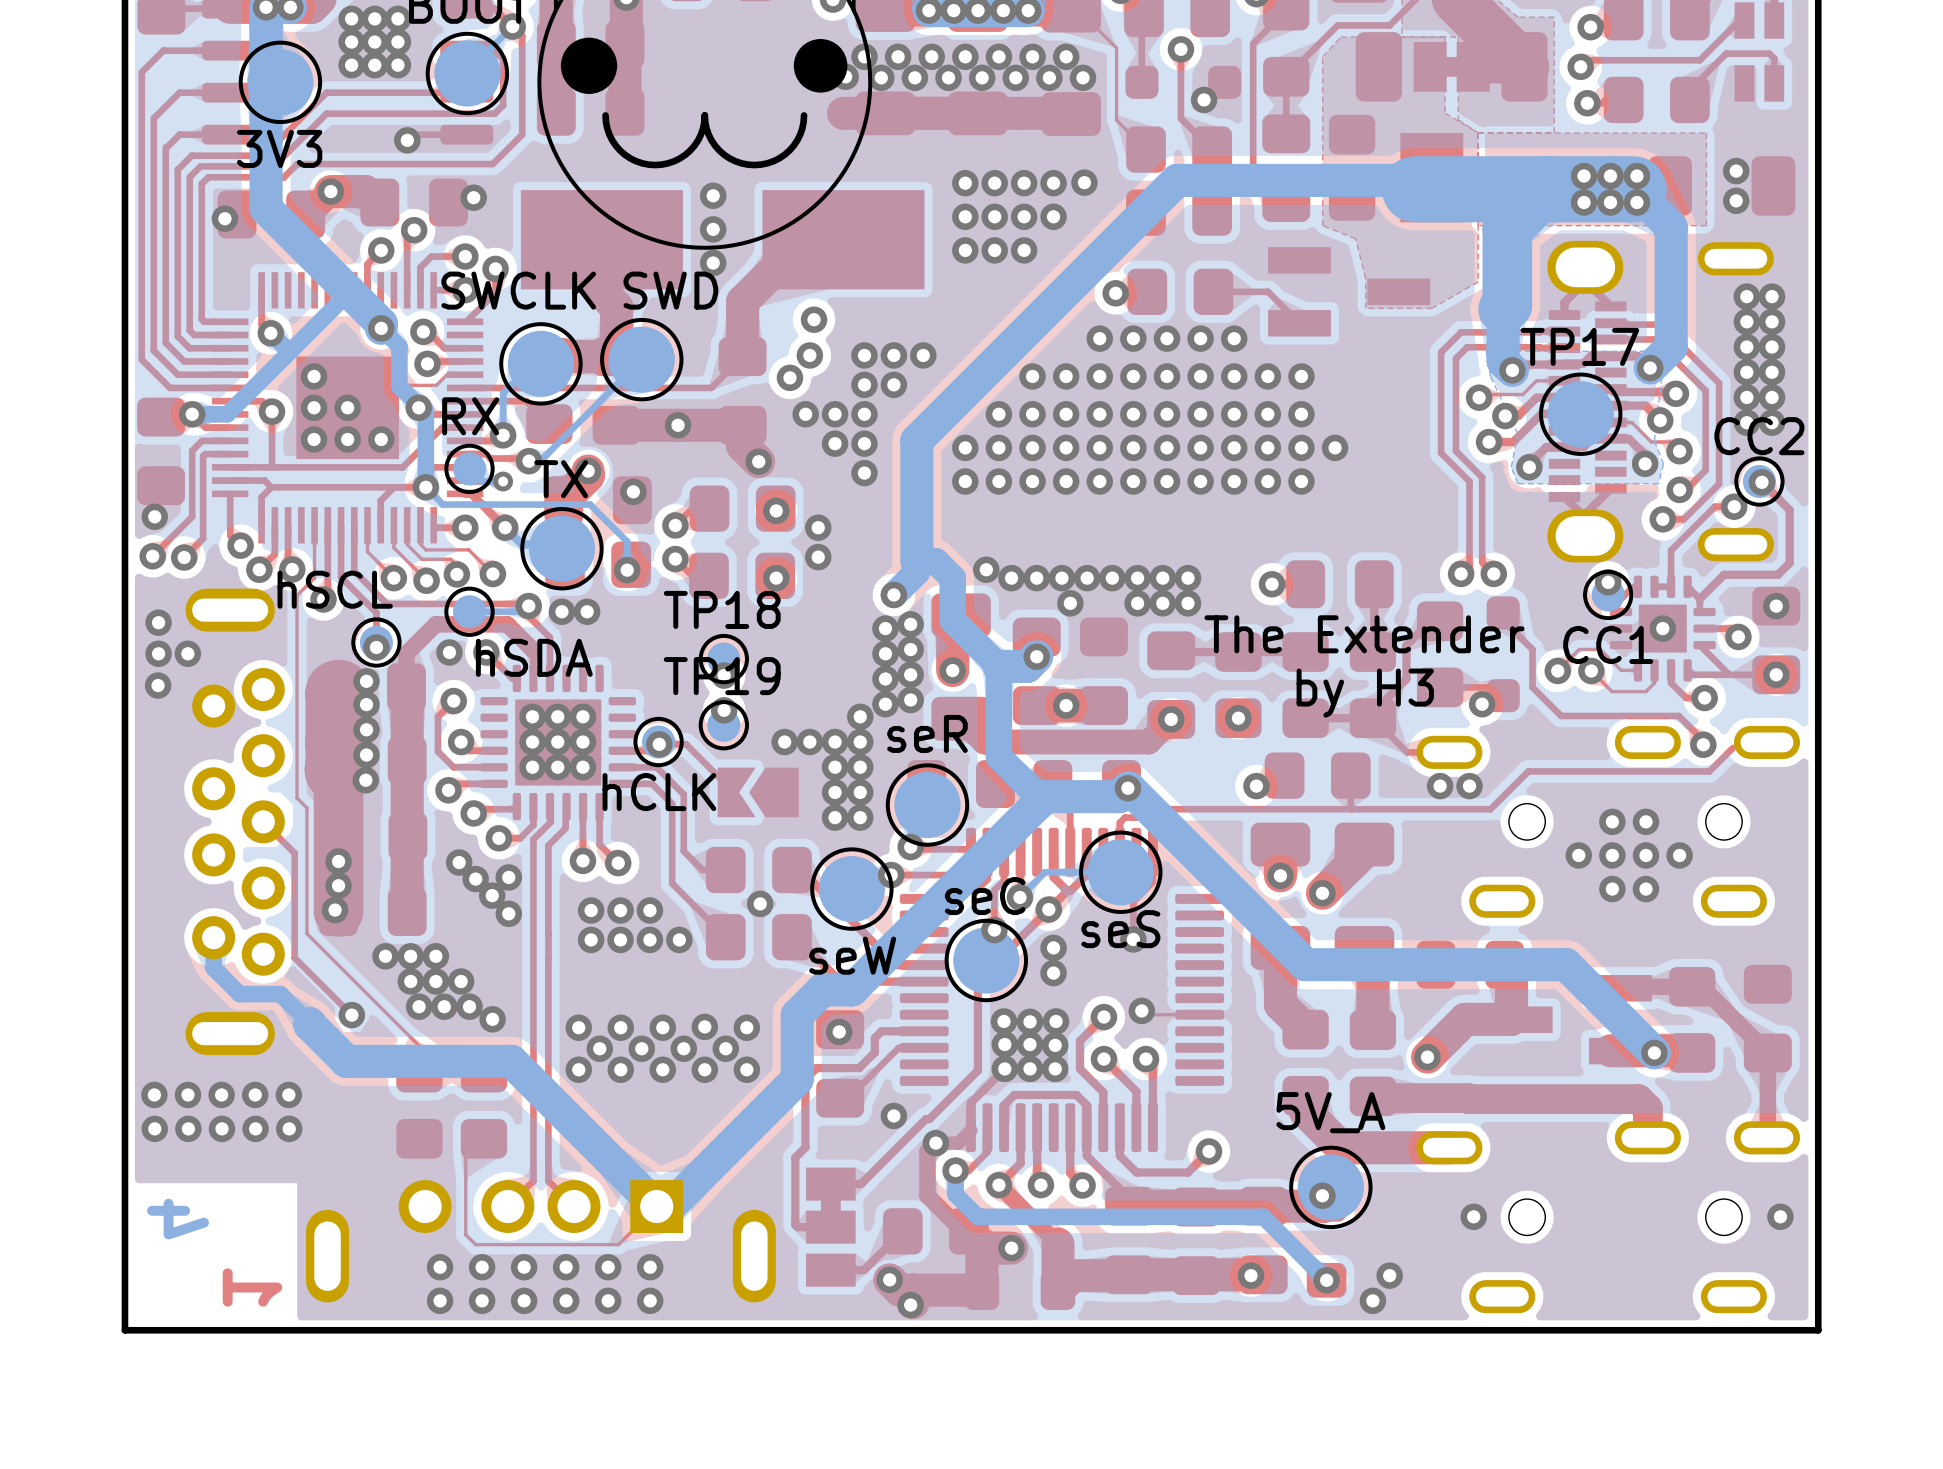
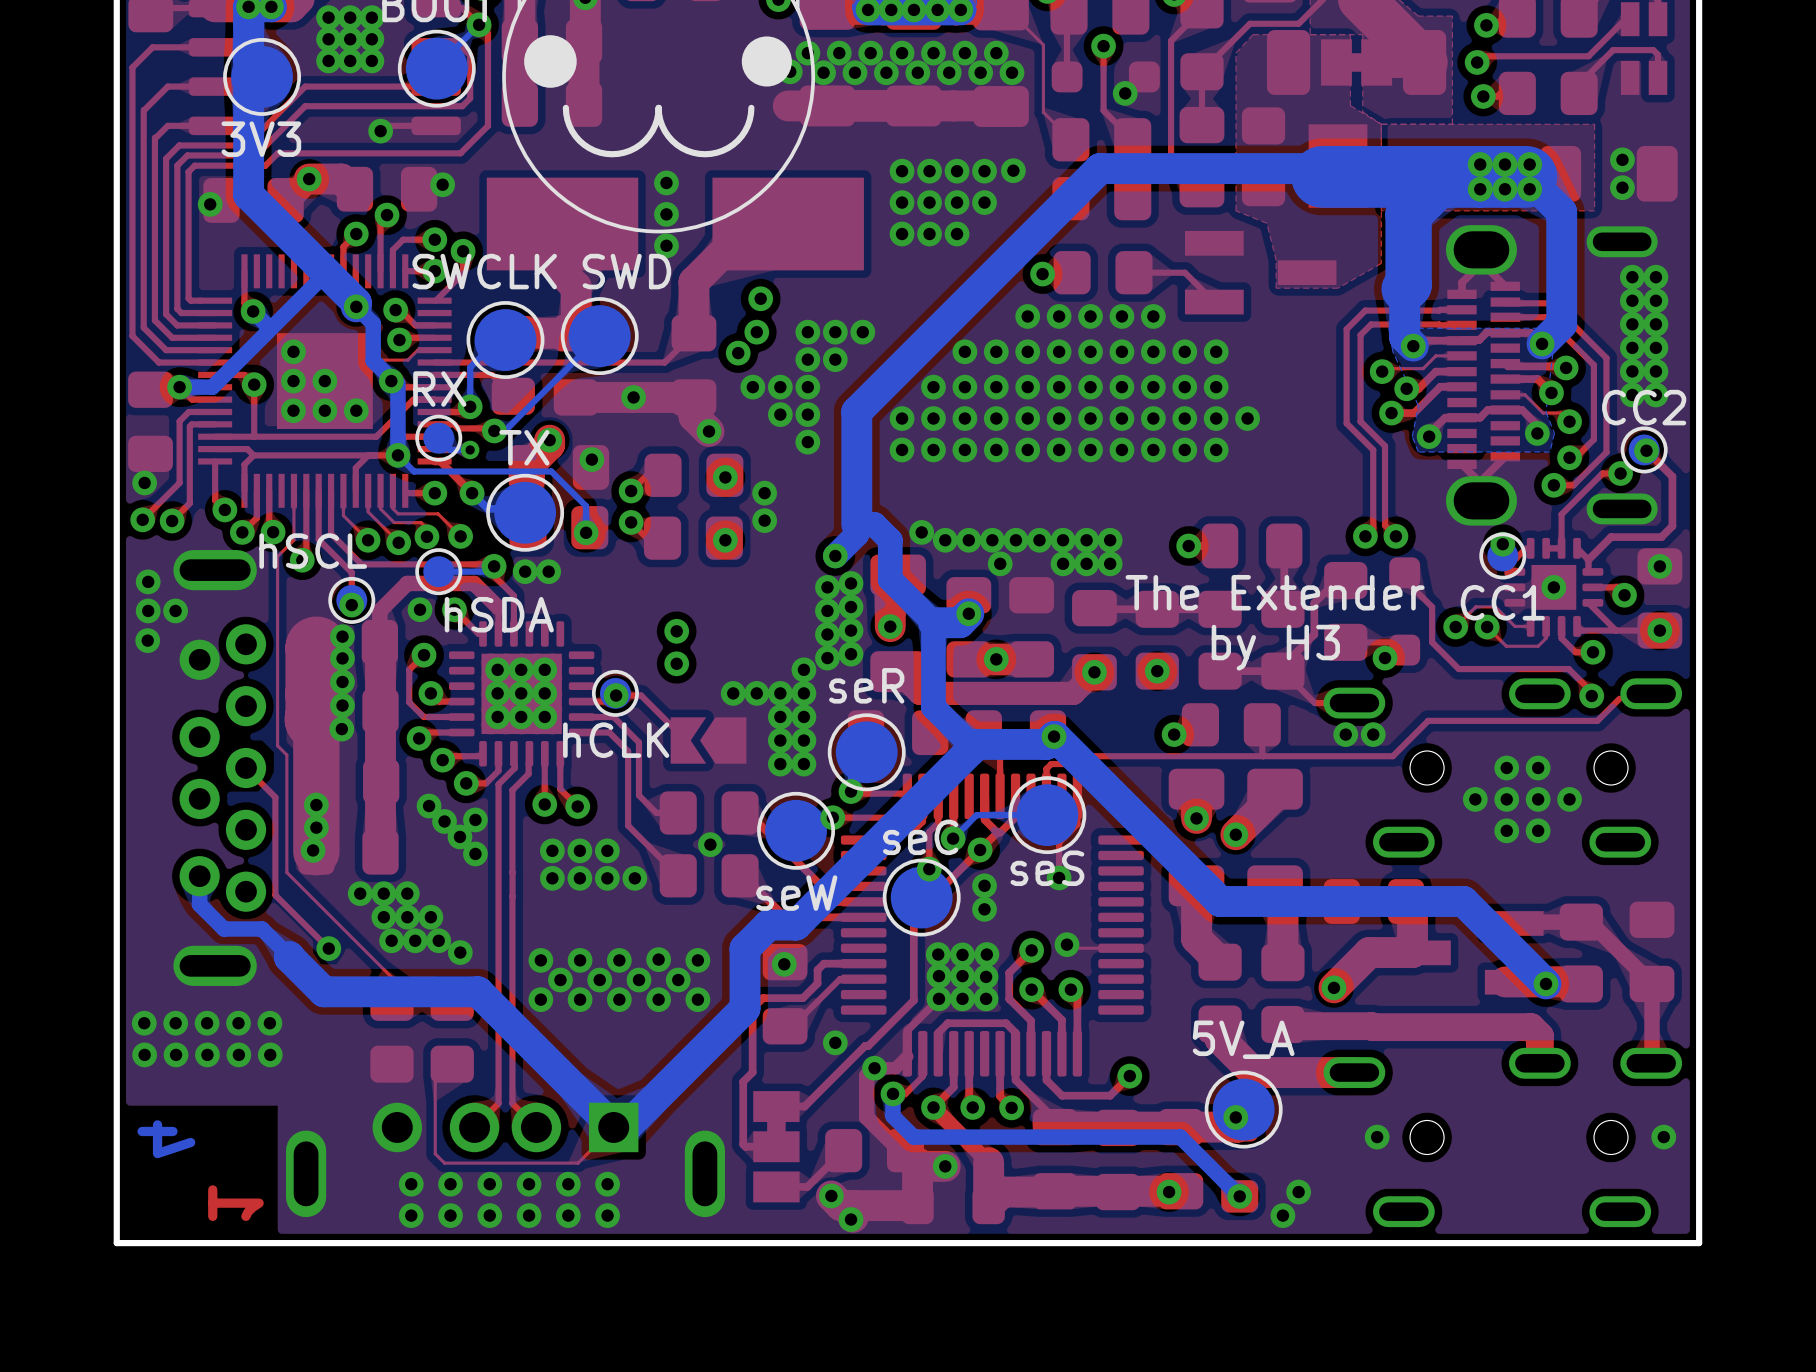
TP17: (1580, 414) -> none
TP18: (723, 659) -> none
TP19: (723, 725) -> none

